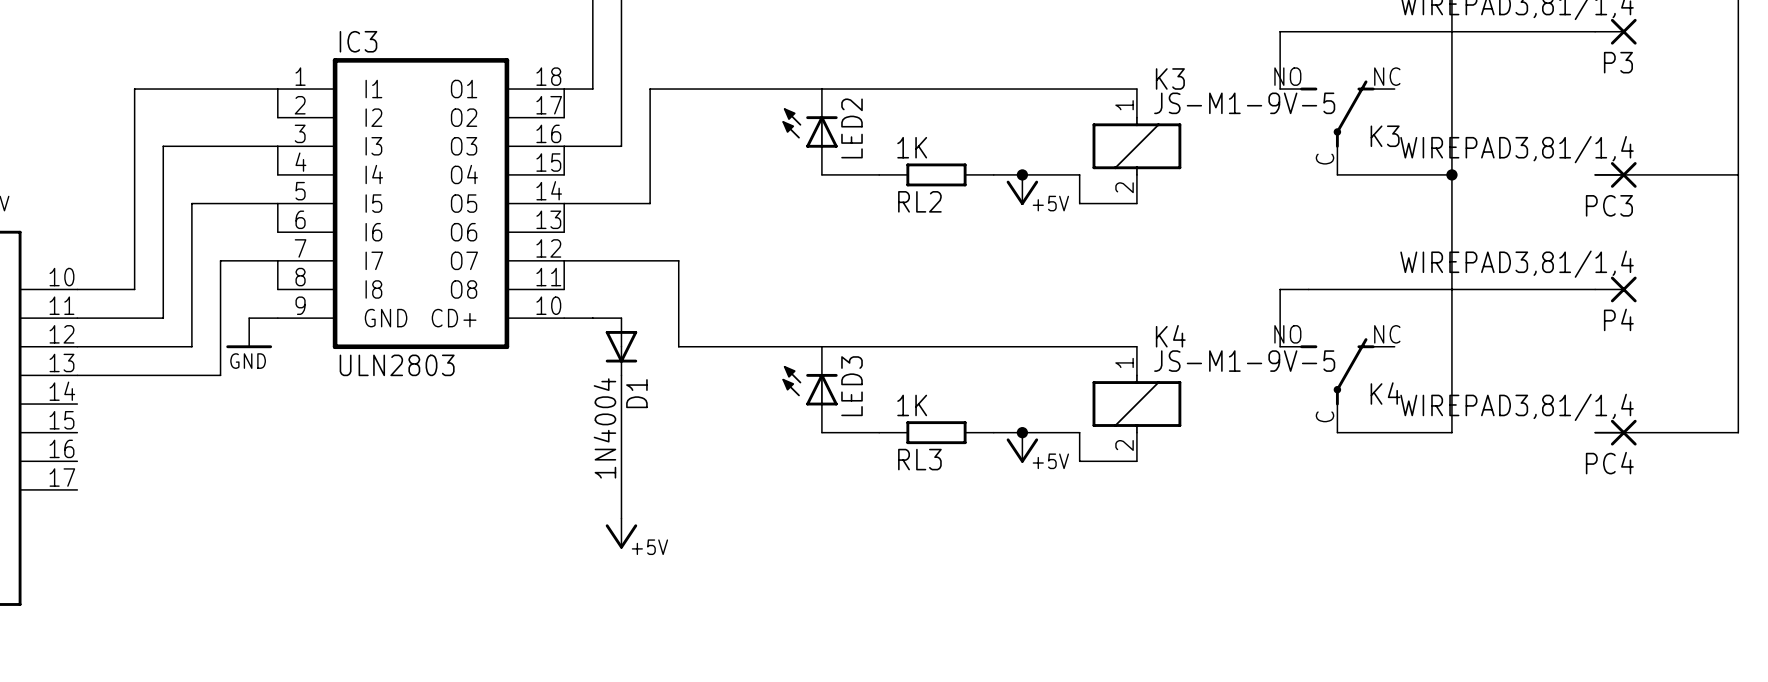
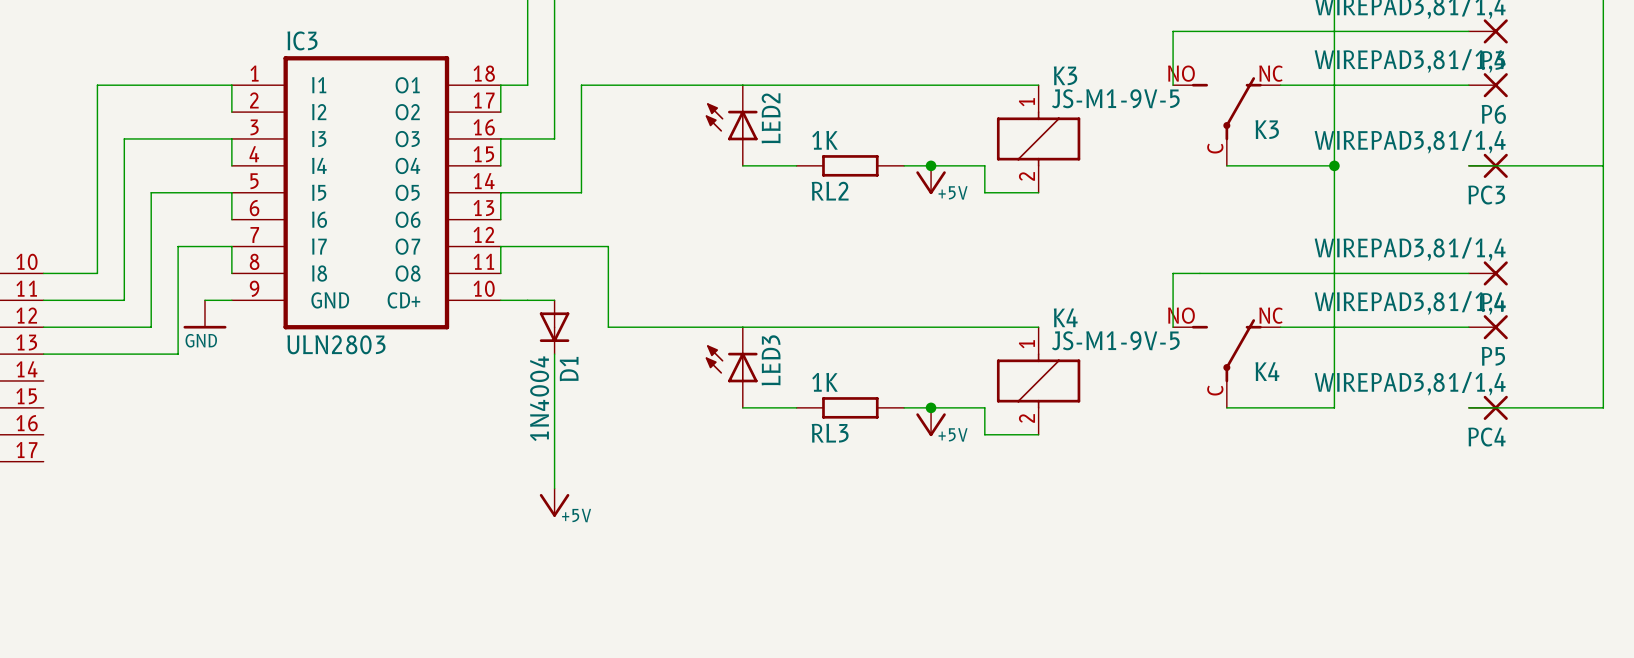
wire: none -> (1280, 85) (1468, 85)
P6: none -> WIREPAD3,81/1,4 (1488, 85)
wire: none -> (1280, 327) (1468, 327)
P5: none -> WIREPAD3,81/1,4 (1488, 327)

